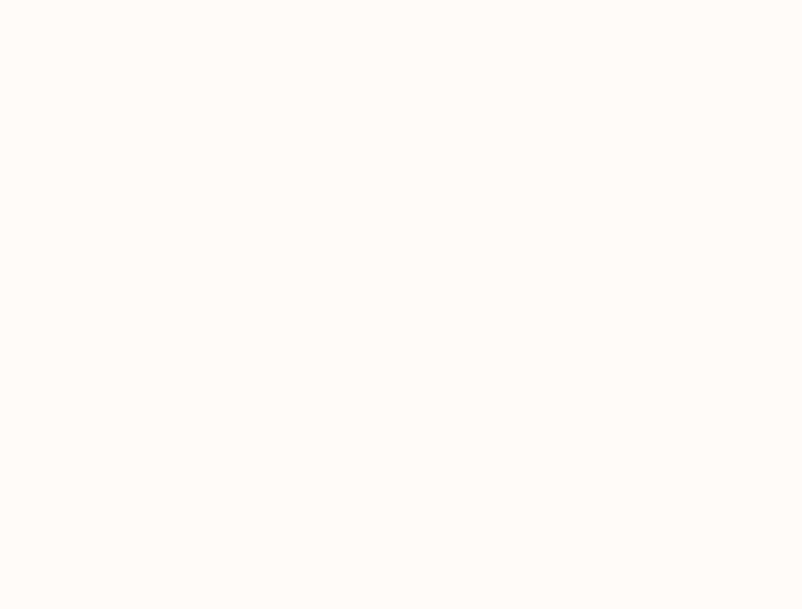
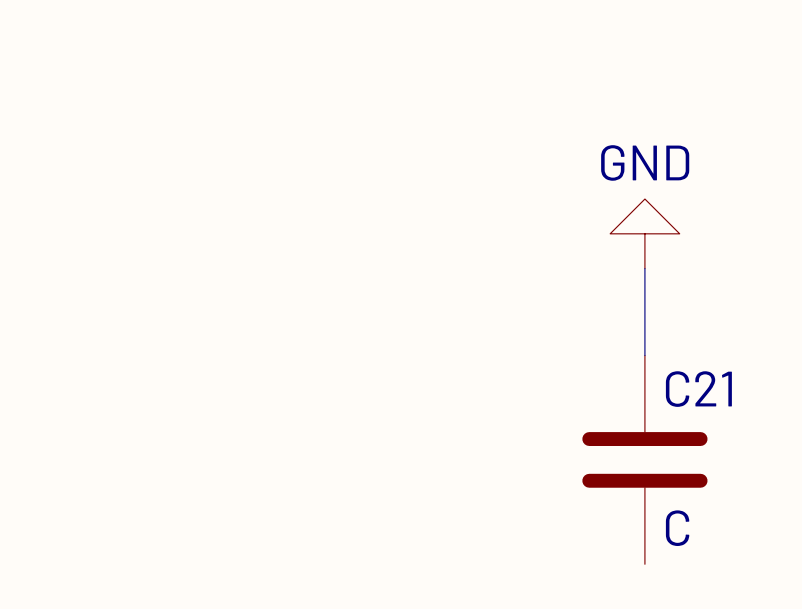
power symbol: none -> GND (644, 233)
wire: none -> (644, 268) (644, 355)
C21: none -> C (644, 459)

